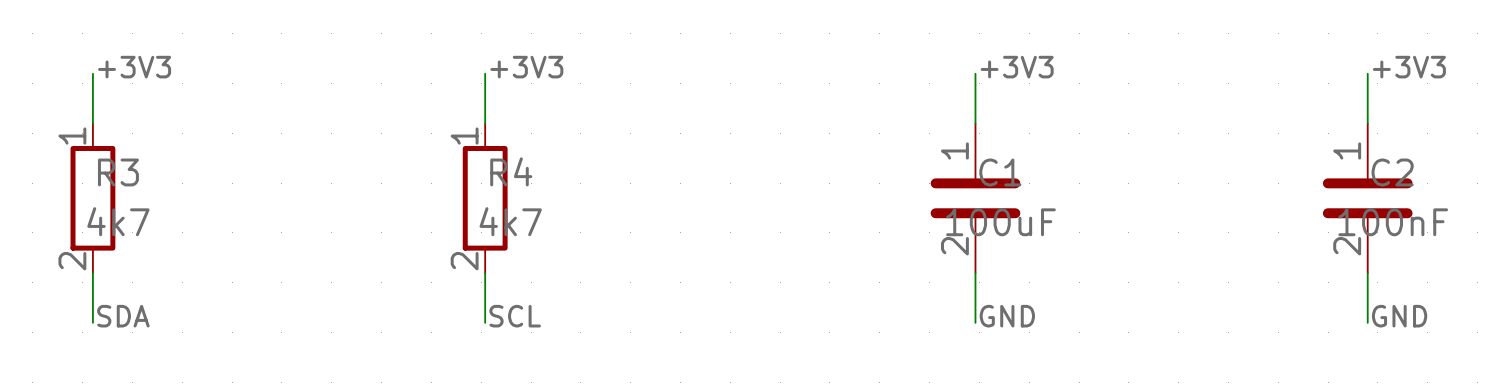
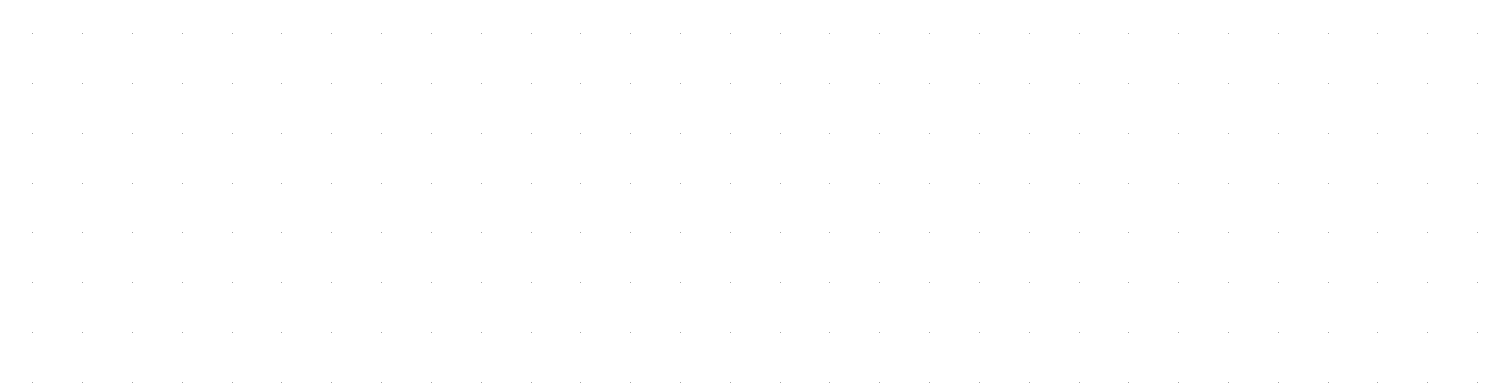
label: +3V3 (134, 67) -> none
label: +3V3 (526, 67) -> none
label: +3V3 (1017, 67) -> none
label: +3V3 (1409, 67) -> none
wire: (92, 73) (92, 123) -> none
wire: (485, 73) (485, 123) -> none
wire: (975, 73) (975, 123) -> none
wire: (1367, 73) (1367, 123) -> none
R3: 4k7 (92, 198) -> none
R4: 4k7 (485, 198) -> none
C1: 100uF (975, 198) -> none
C2: 100nF (1367, 198) -> none
wire: (92, 273) (92, 322) -> none
wire: (485, 273) (485, 322) -> none
wire: (975, 273) (975, 322) -> none
wire: (1367, 273) (1367, 322) -> none
label: SDA (123, 316) -> none
label: SCL (515, 316) -> none
label: GND (1007, 316) -> none
label: GND (1399, 316) -> none

